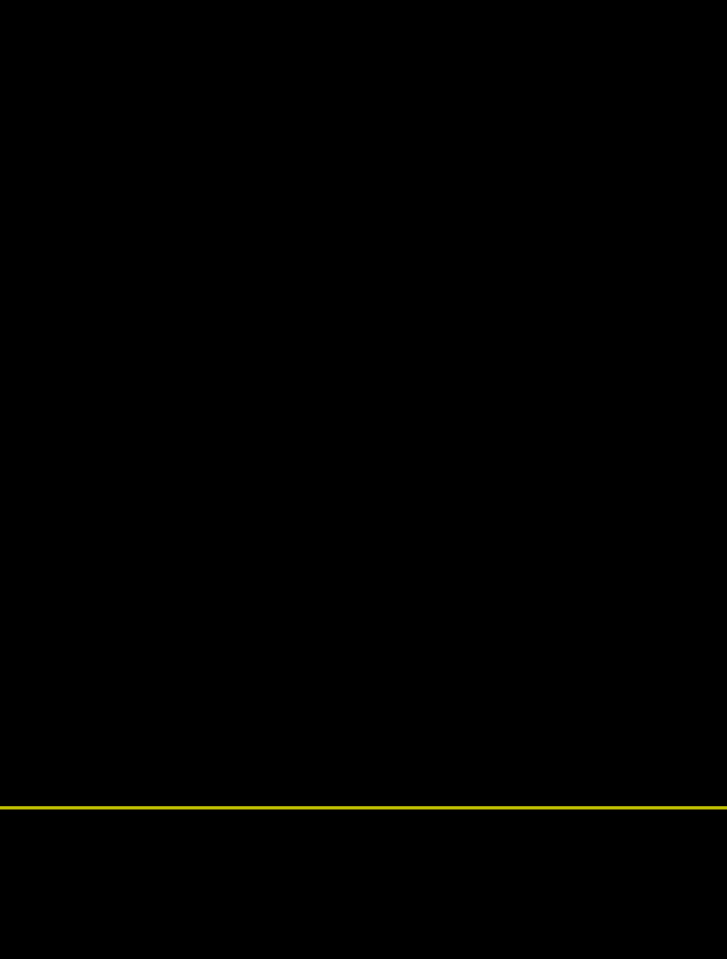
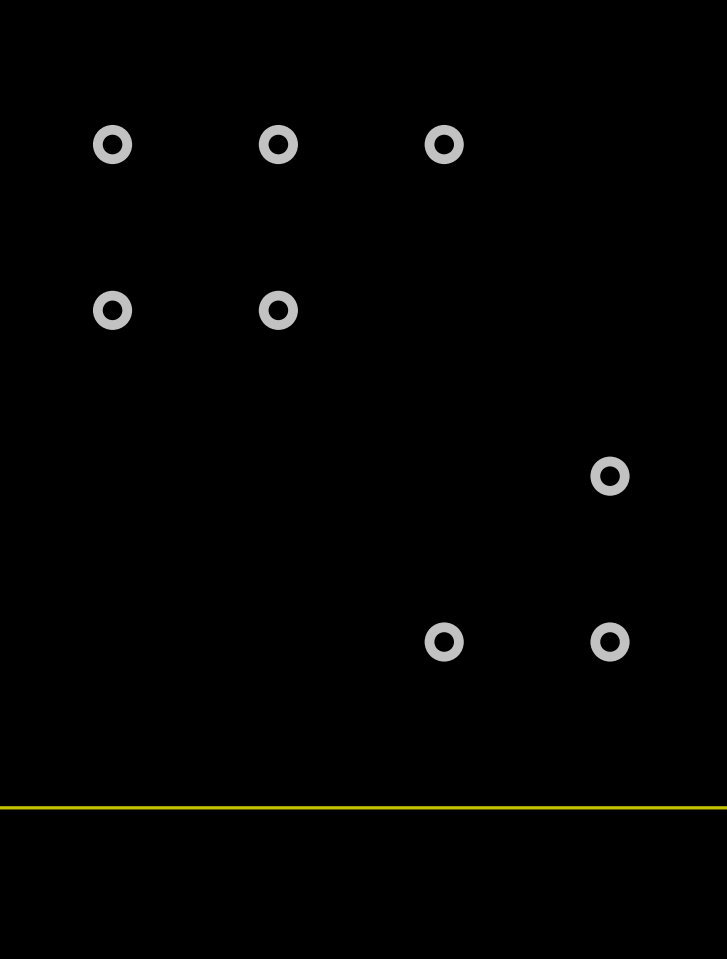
via: none -> (112, 144)
via: none -> (278, 144)
via: none -> (444, 144)
via: none -> (112, 310)
via: none -> (278, 310)
via: none -> (610, 476)
via: none -> (444, 642)
via: none -> (610, 642)

